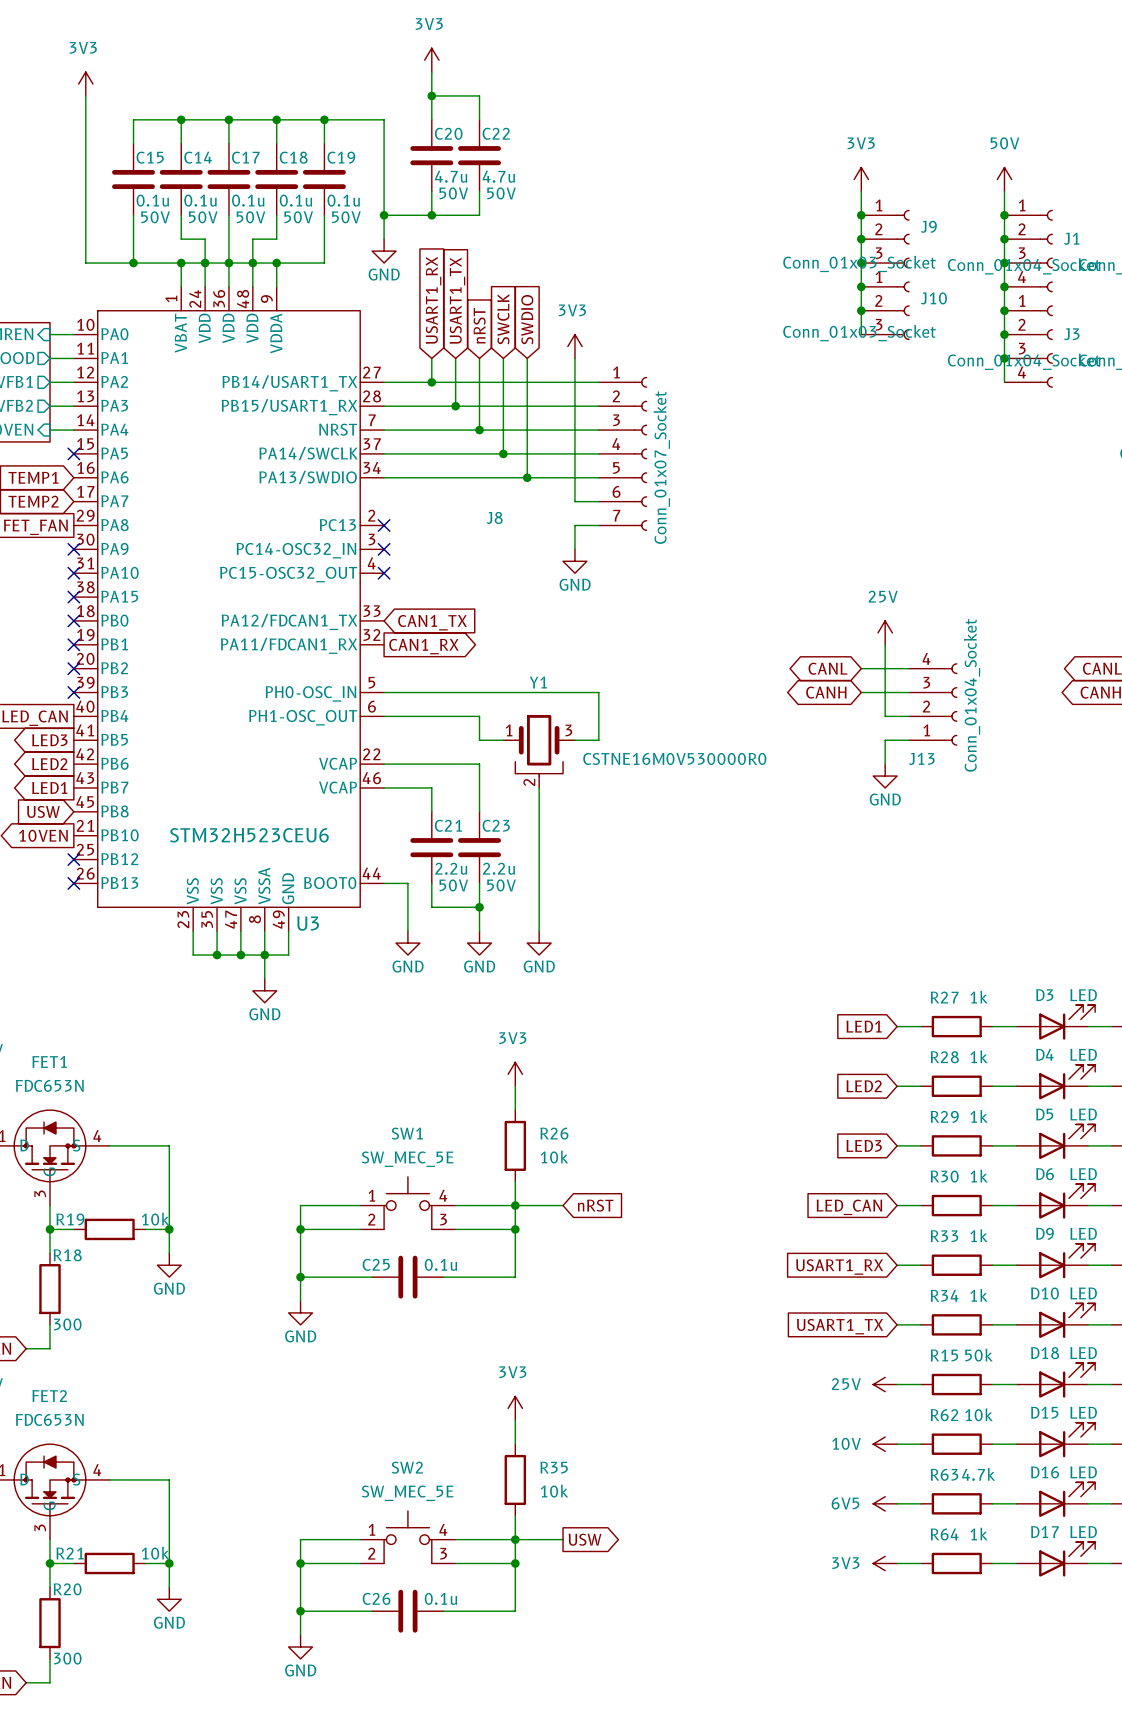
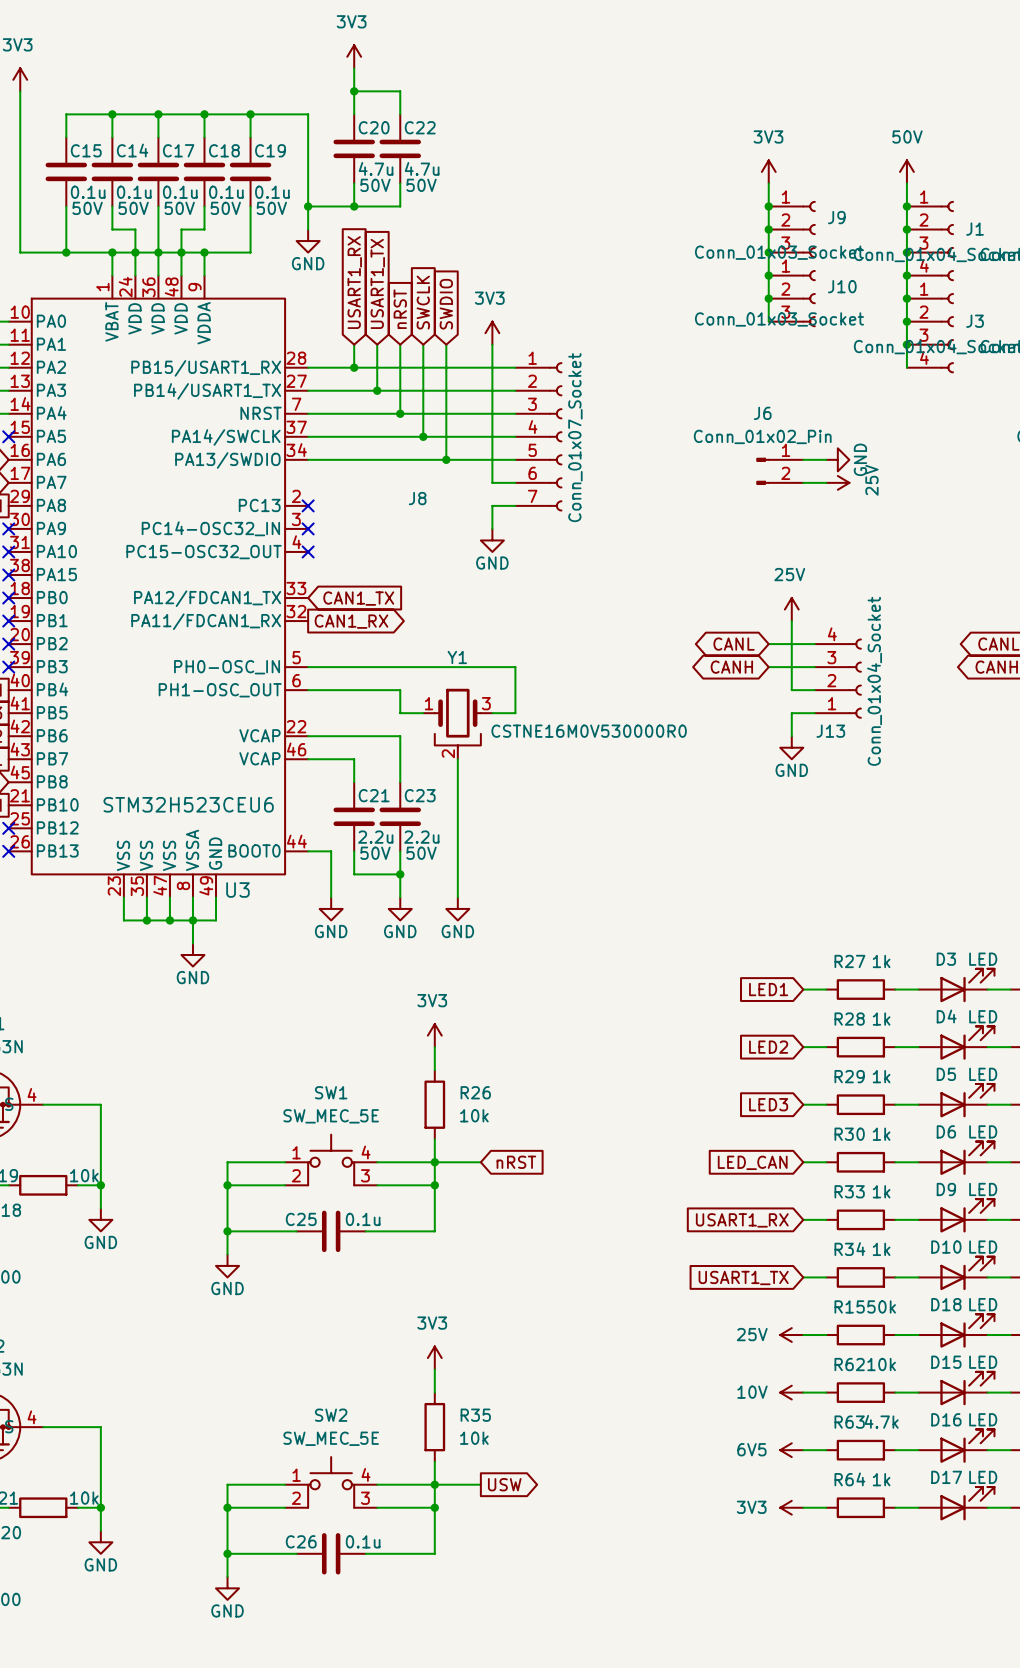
U3 pin number: 27 (371, 372) -> 28 (296, 358)
U3 pin name: PB14/USART1_TX (289, 383) -> PB15/USART1_RX (206, 368)
U3 pin number: 28 (372, 396) -> 27 (296, 381)
U3 pin name: PB15/USART1_RX (289, 407) -> PB14/USART1_TX (207, 391)
wire: none -> (803, 459) (826, 459)
power symbol: none -> GND (837, 459)
J6: none -> Conn_01x02_Pin (779, 471)
wire: none -> (803, 482) (826, 482)
power symbol: none -> 25V (837, 482)

